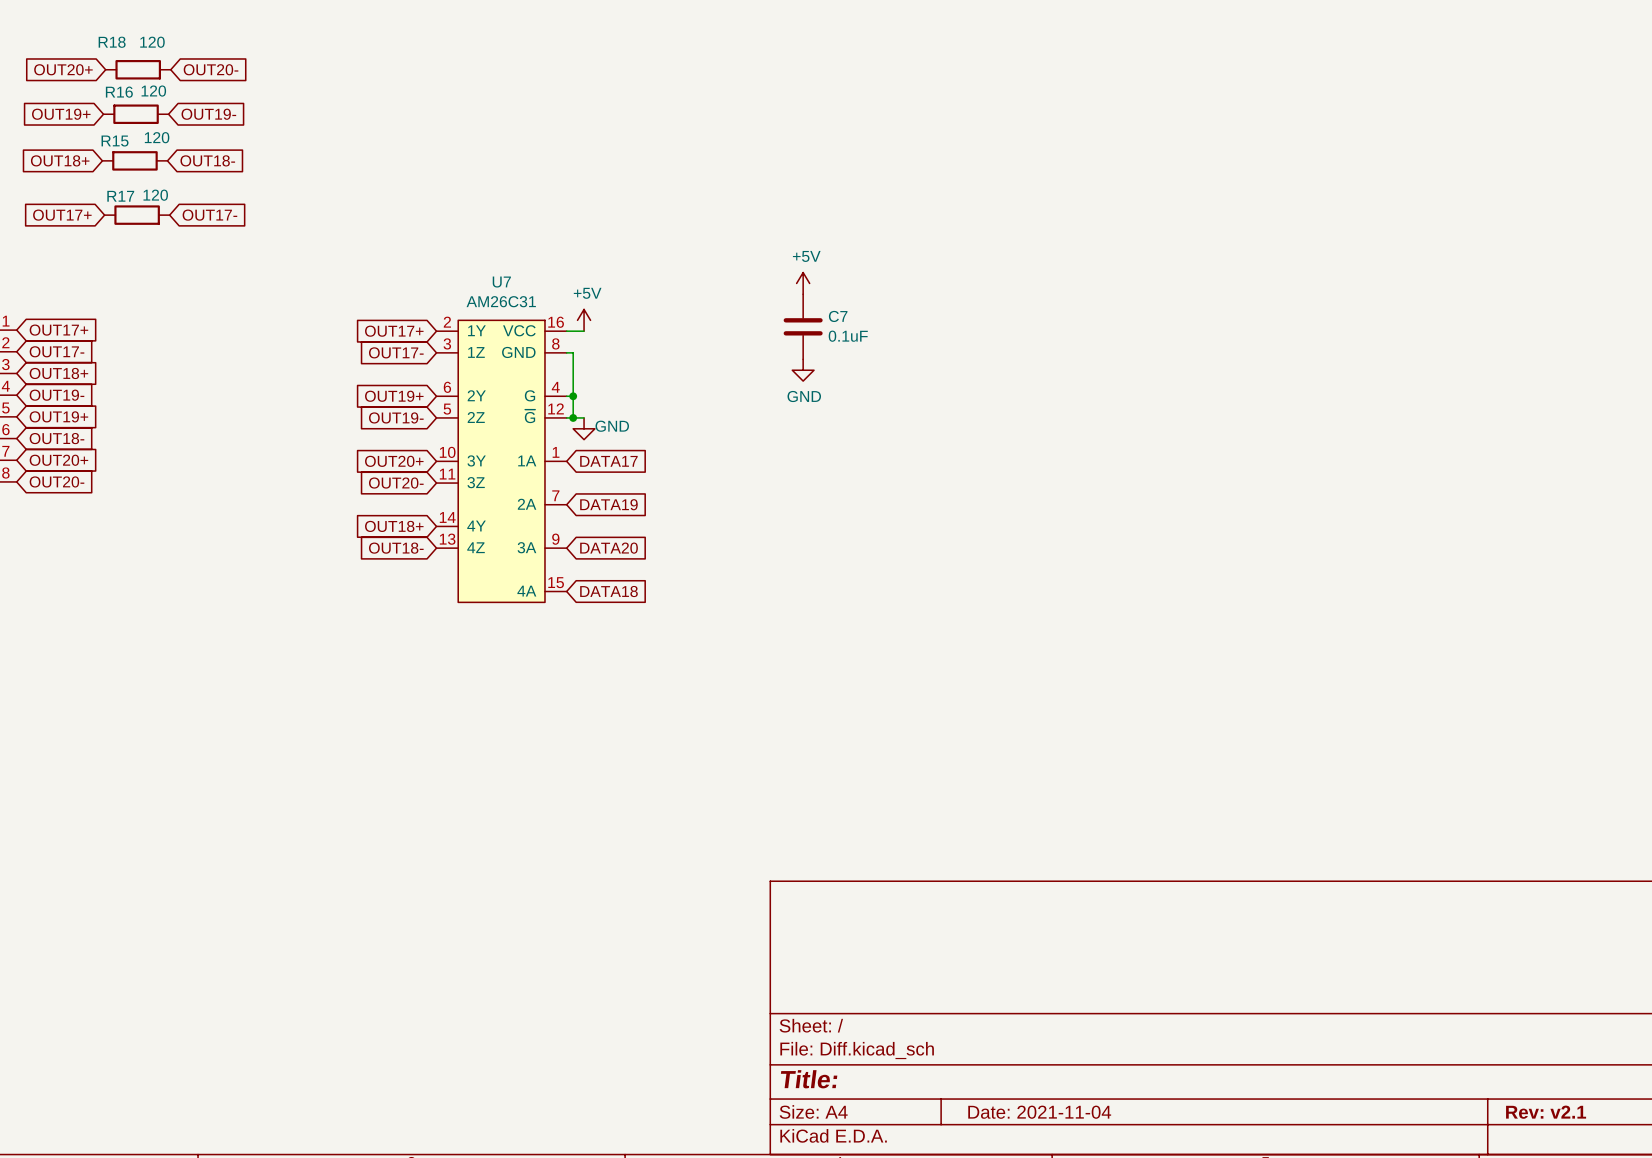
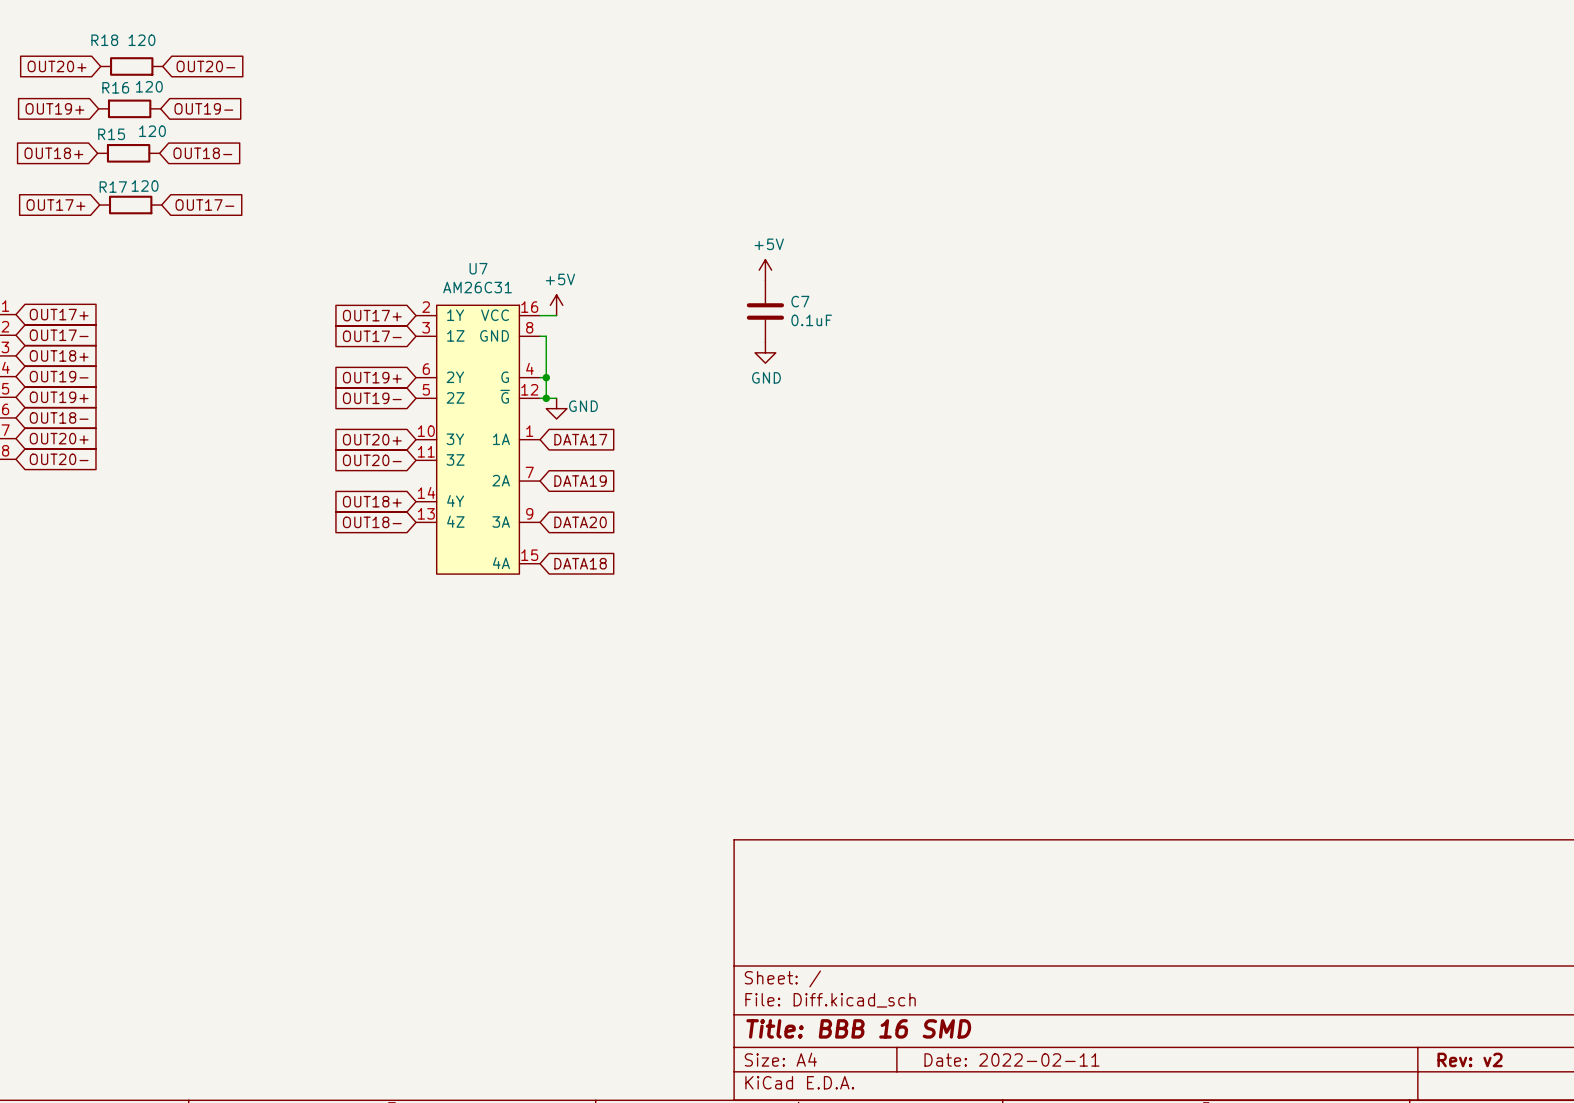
title block: Title: (809, 1079) -> Title: BBB 16 SMD (858, 1028)
title block: Date: 2021-11-04 (1039, 1112) -> Date: 2022-02-11 (1011, 1059)
title block: Rev: v2.1 (1546, 1112) -> Rev: v2 (1470, 1059)

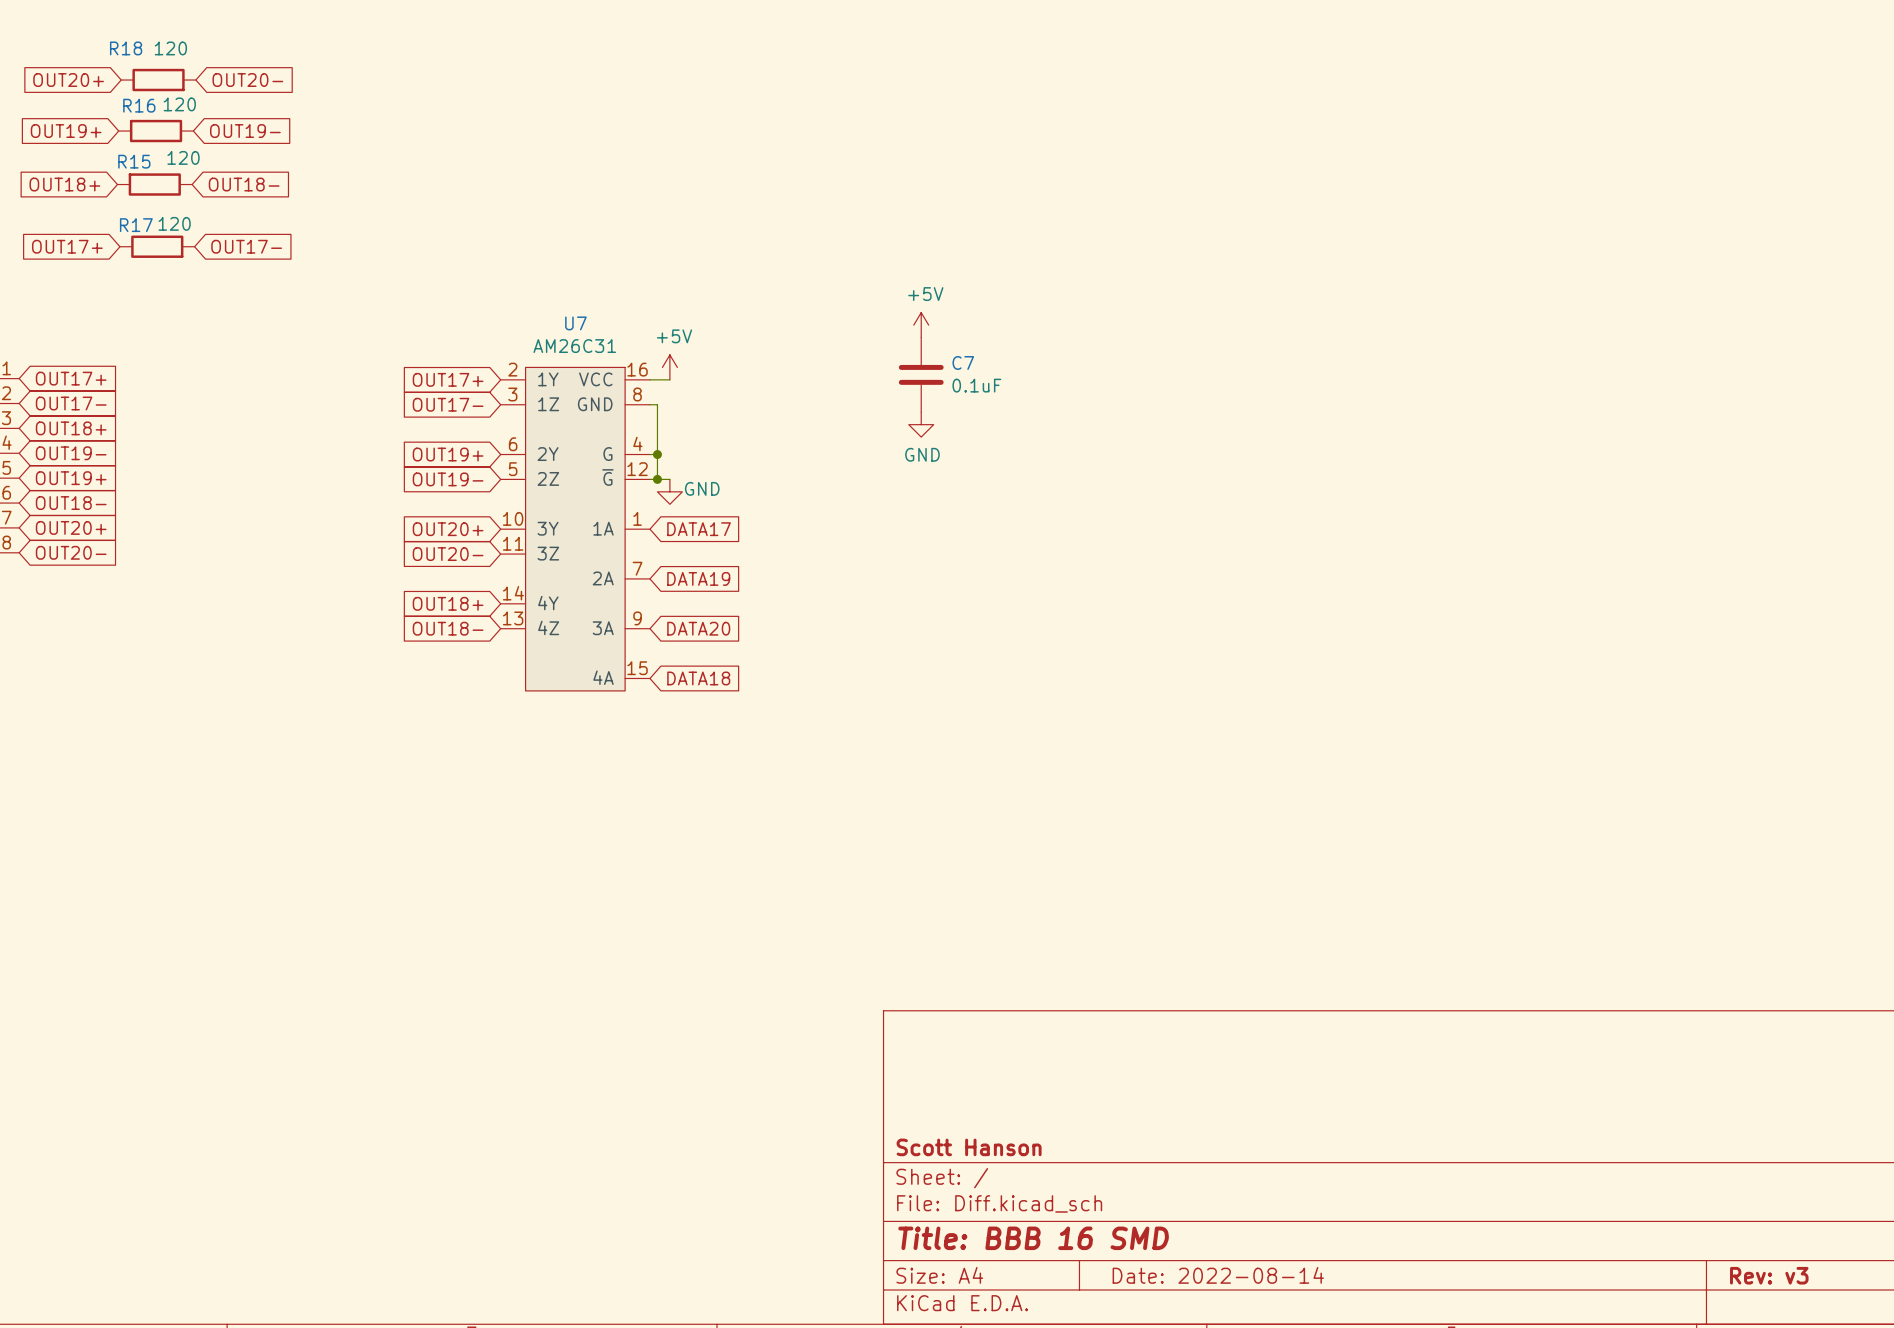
title block: none -> Scott Hanson (969, 1147)
title block: Date: 2022-02-11 (1011, 1059) -> Date: 2022-08-14 (1218, 1275)
title block: Rev: v2 (1470, 1059) -> Rev: v3 (1769, 1275)

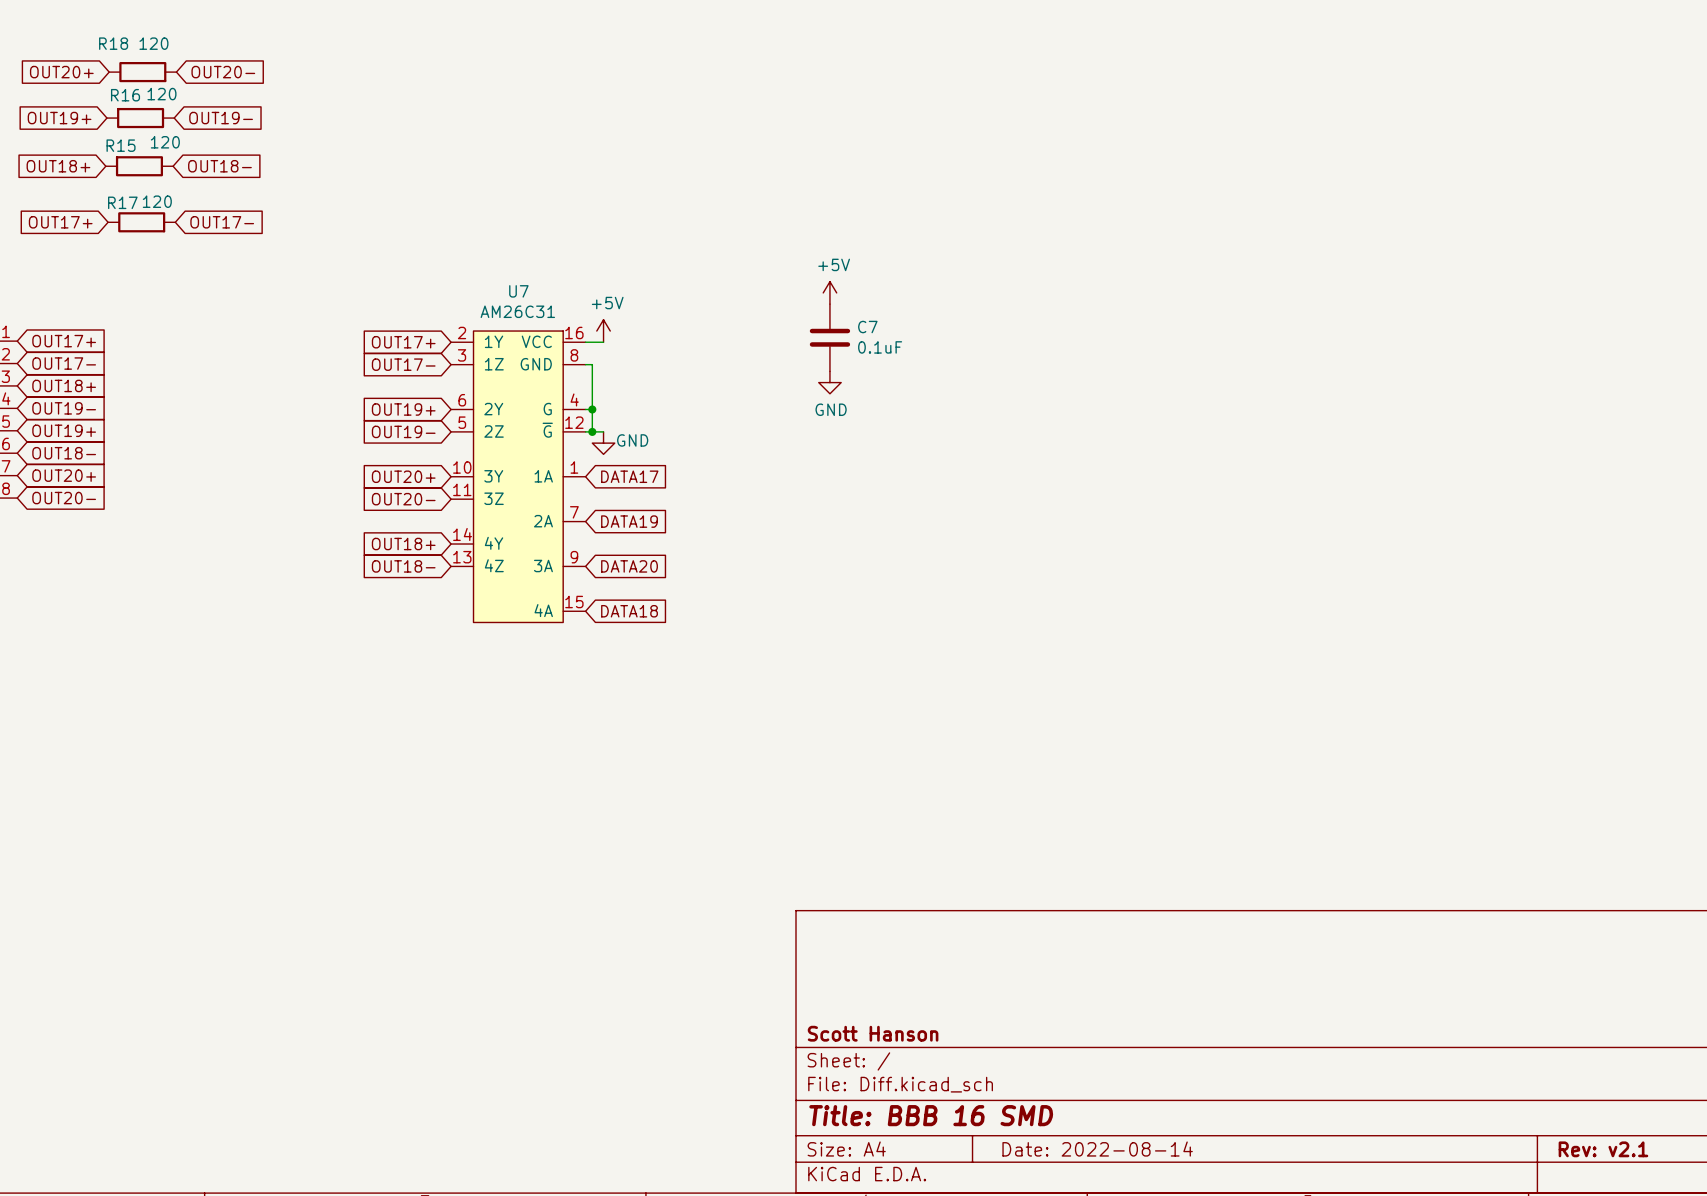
title block: Rev: v3 (1769, 1275) -> Rev: v2.1 (1603, 1149)

